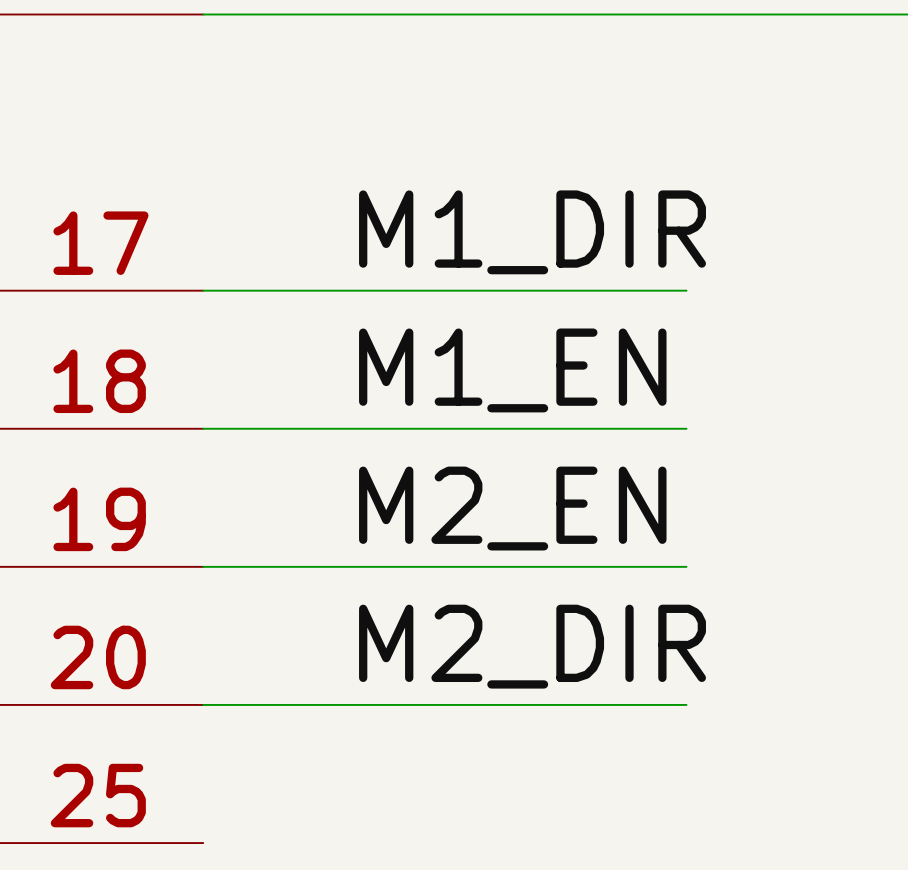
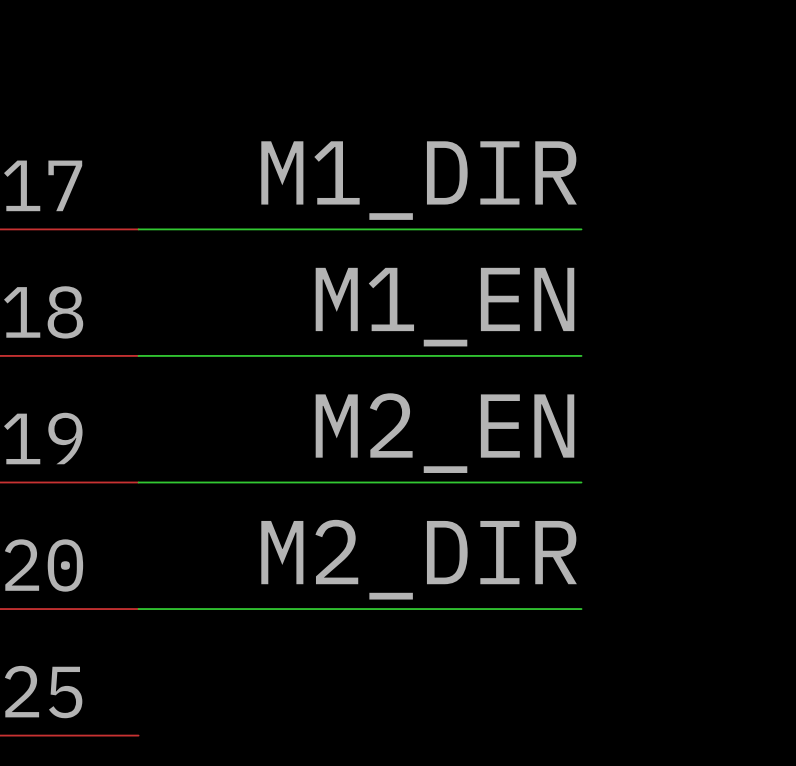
label position: M1_DIR (532, 232) -> M1_DIR (419, 180)
label position: M1_EN (512, 370) -> M1_EN (444, 307)
label position: M2_EN (512, 508) -> M2_EN (444, 433)
label position: M2_DIR (532, 646) -> M2_DIR (419, 559)

